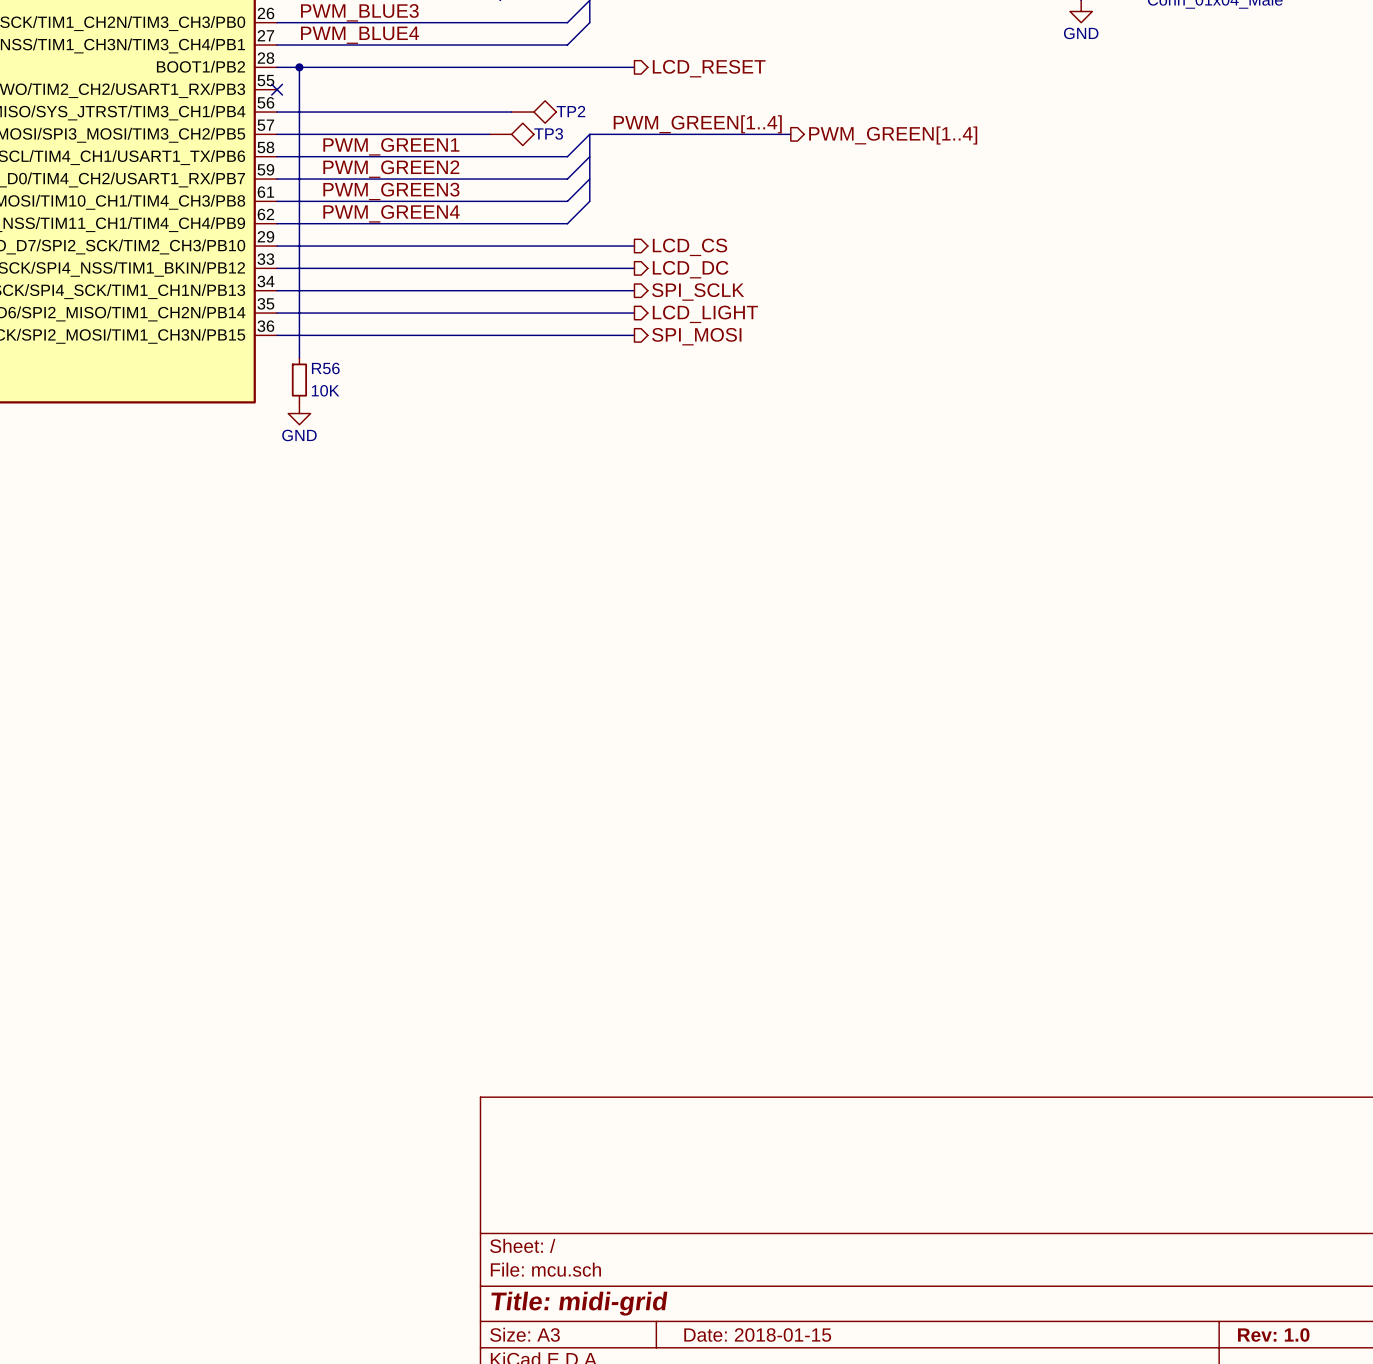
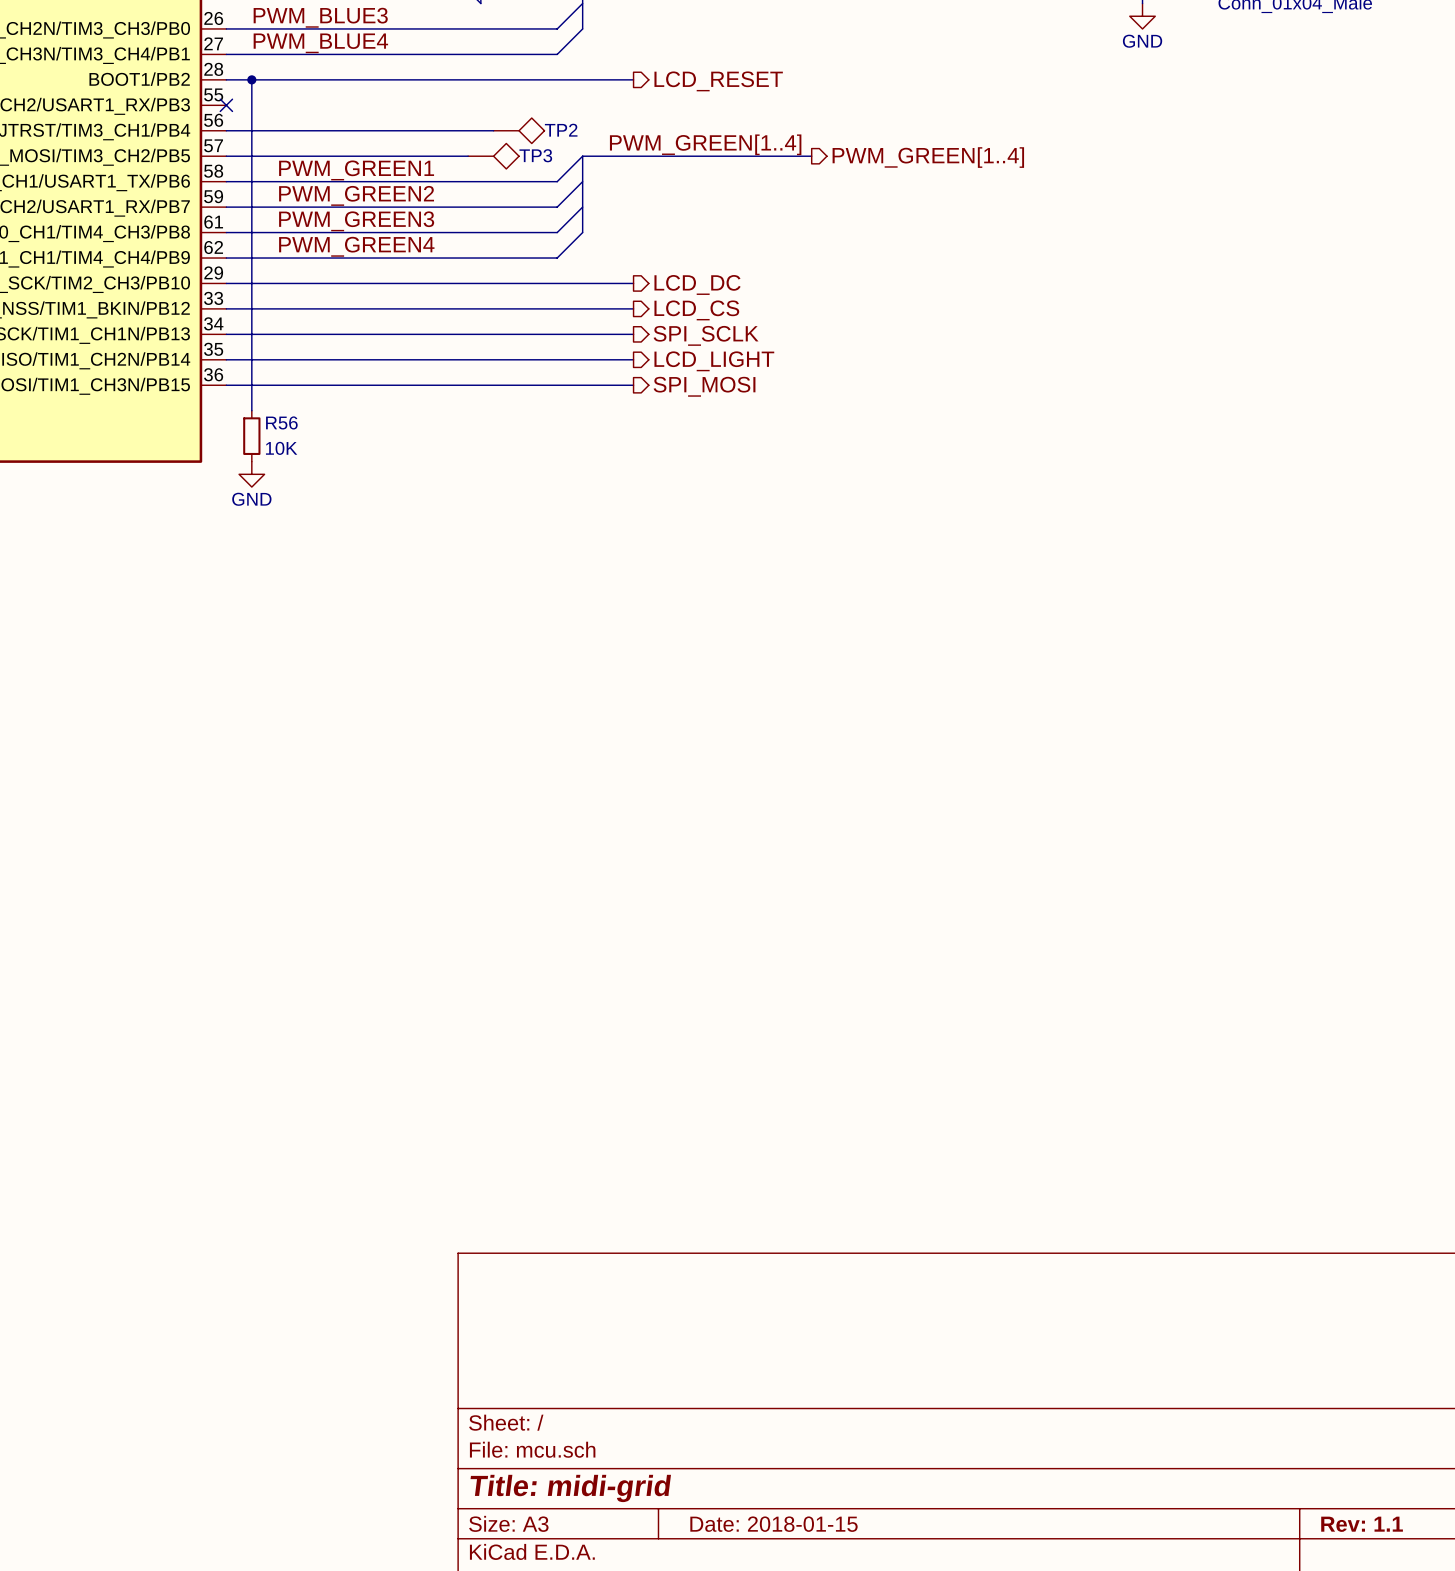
hierarchical label: LCD_CS (690, 247) -> LCD_DC (697, 284)
hierarchical label: LCD_DC (690, 269) -> LCD_CS (696, 310)
title block: Rev: 1.0 (1273, 1334) -> Rev: 1.1 (1362, 1524)

